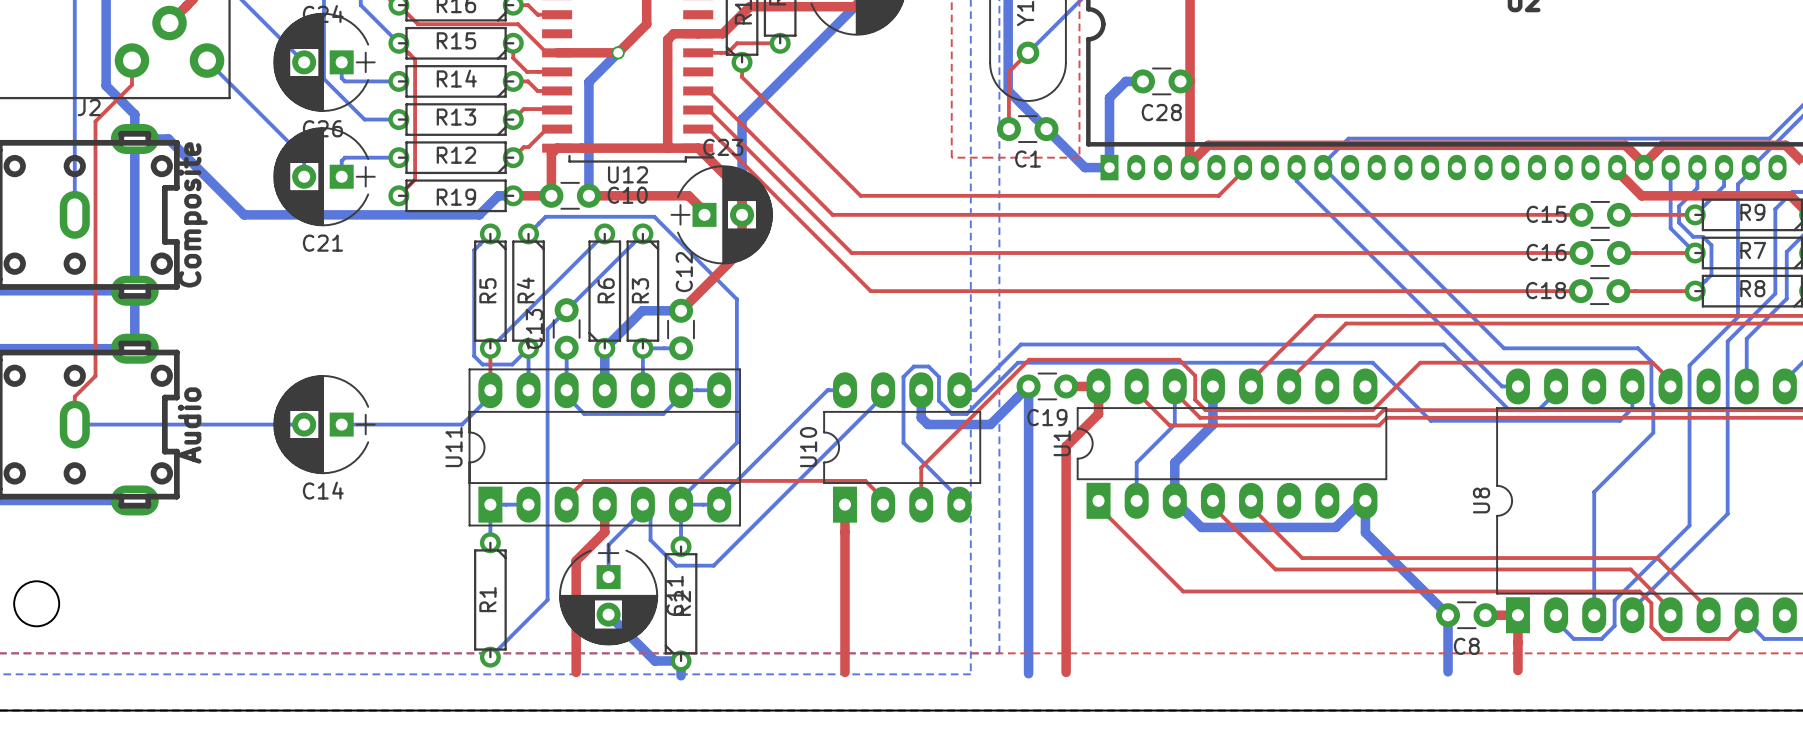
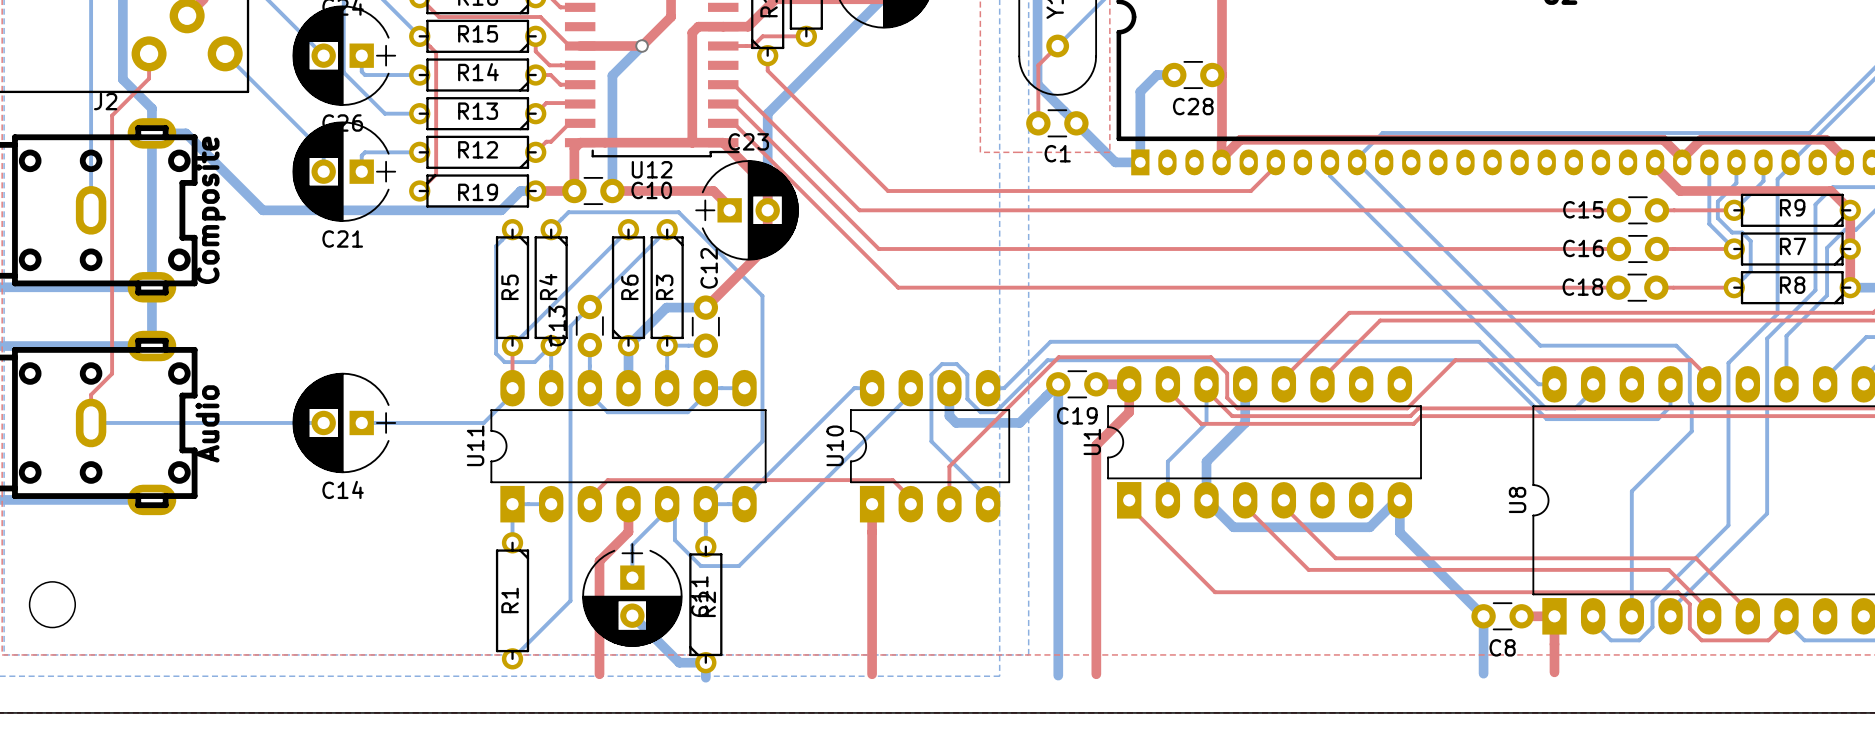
bottom track: (1372, 362) (1430, 420) (1510, 420) -> (1407, 360) (1487, 360) (1546, 419)
U11 footprint: [468, 368, 741, 527] -> [490, 369, 767, 523]

